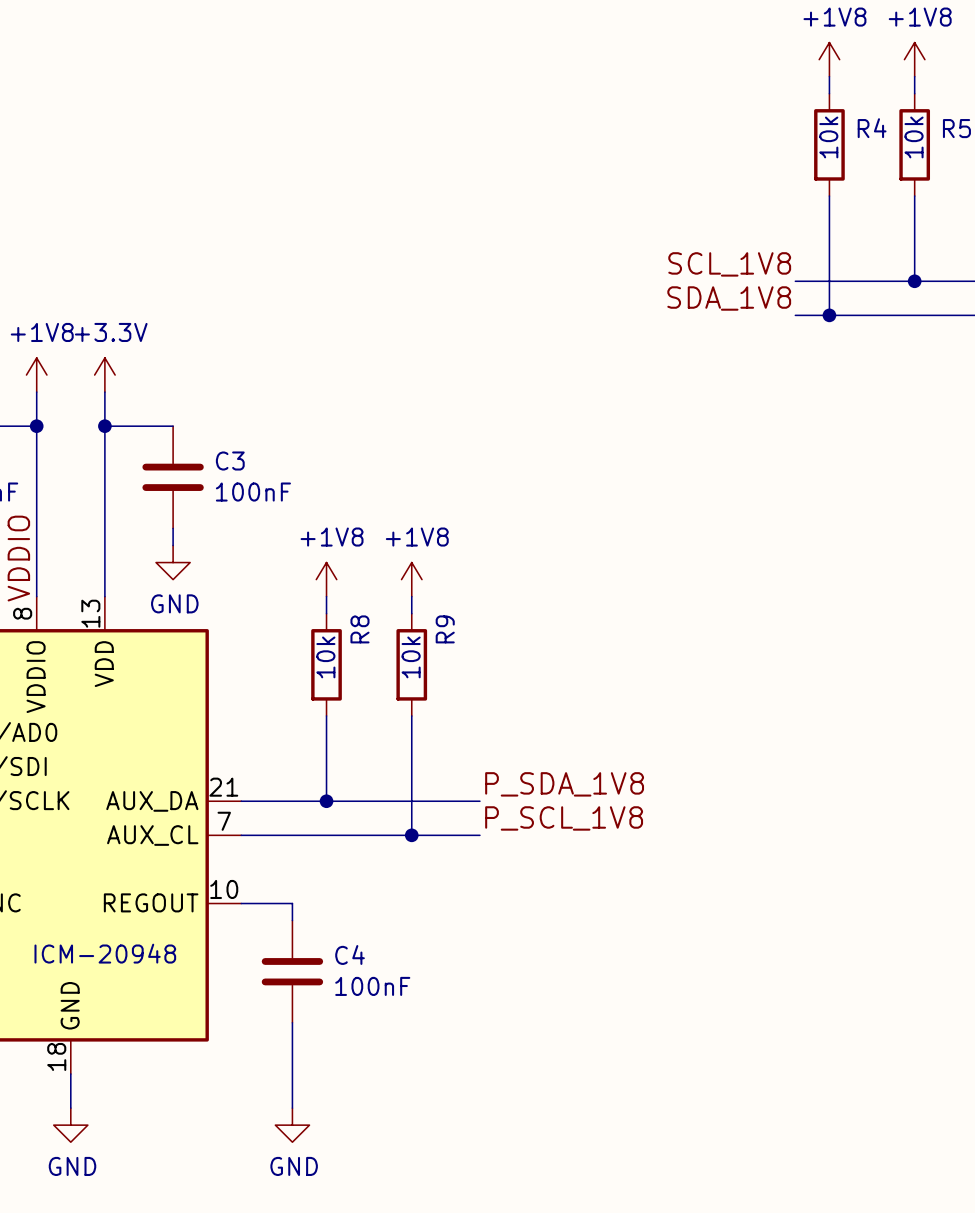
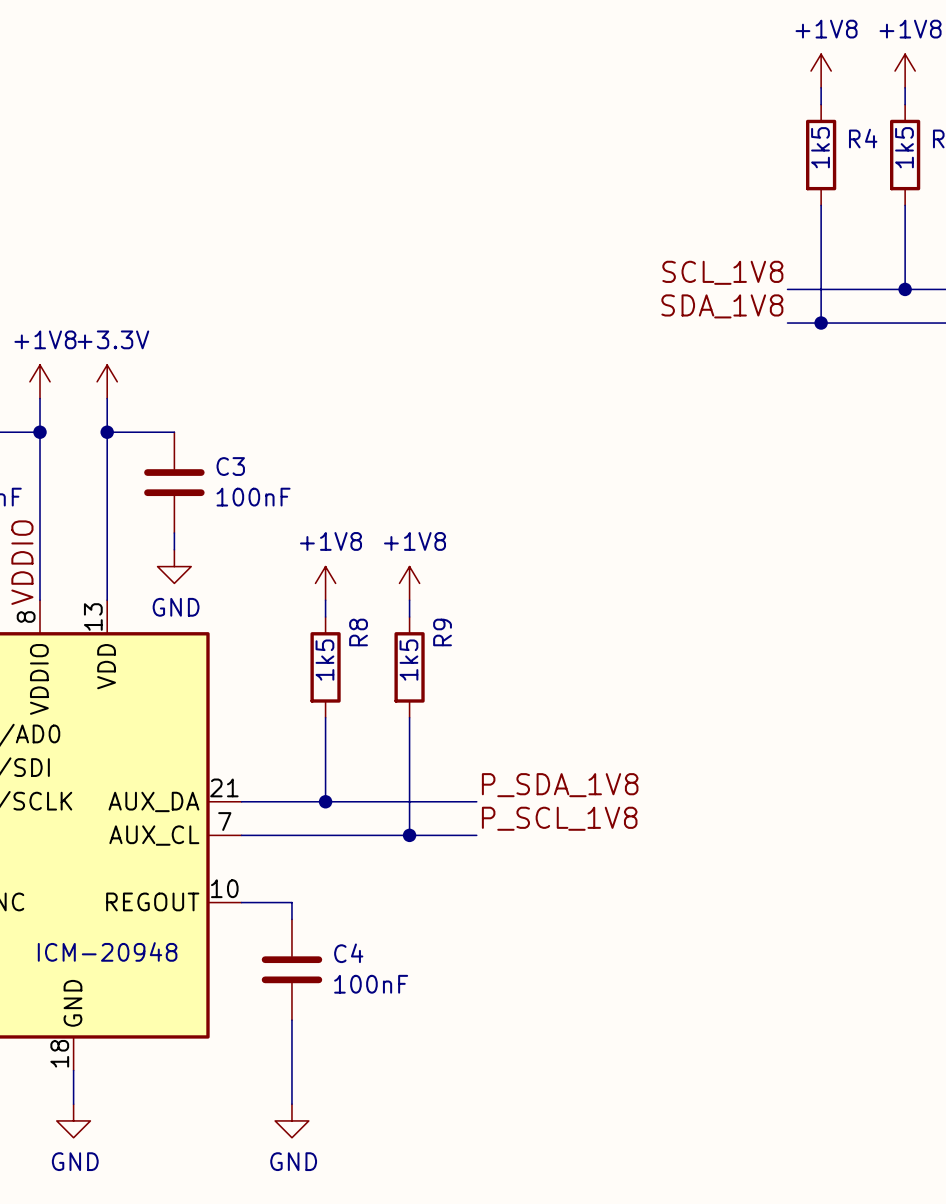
R4 value: 10k (828, 137) -> 1k5 (820, 147)
R5 value: 10k (914, 137) -> 1k5 (904, 147)
R8 value: 10k (325, 657) -> 1k5 (324, 660)
R9 value: 10k (411, 657) -> 1k5 (408, 660)

